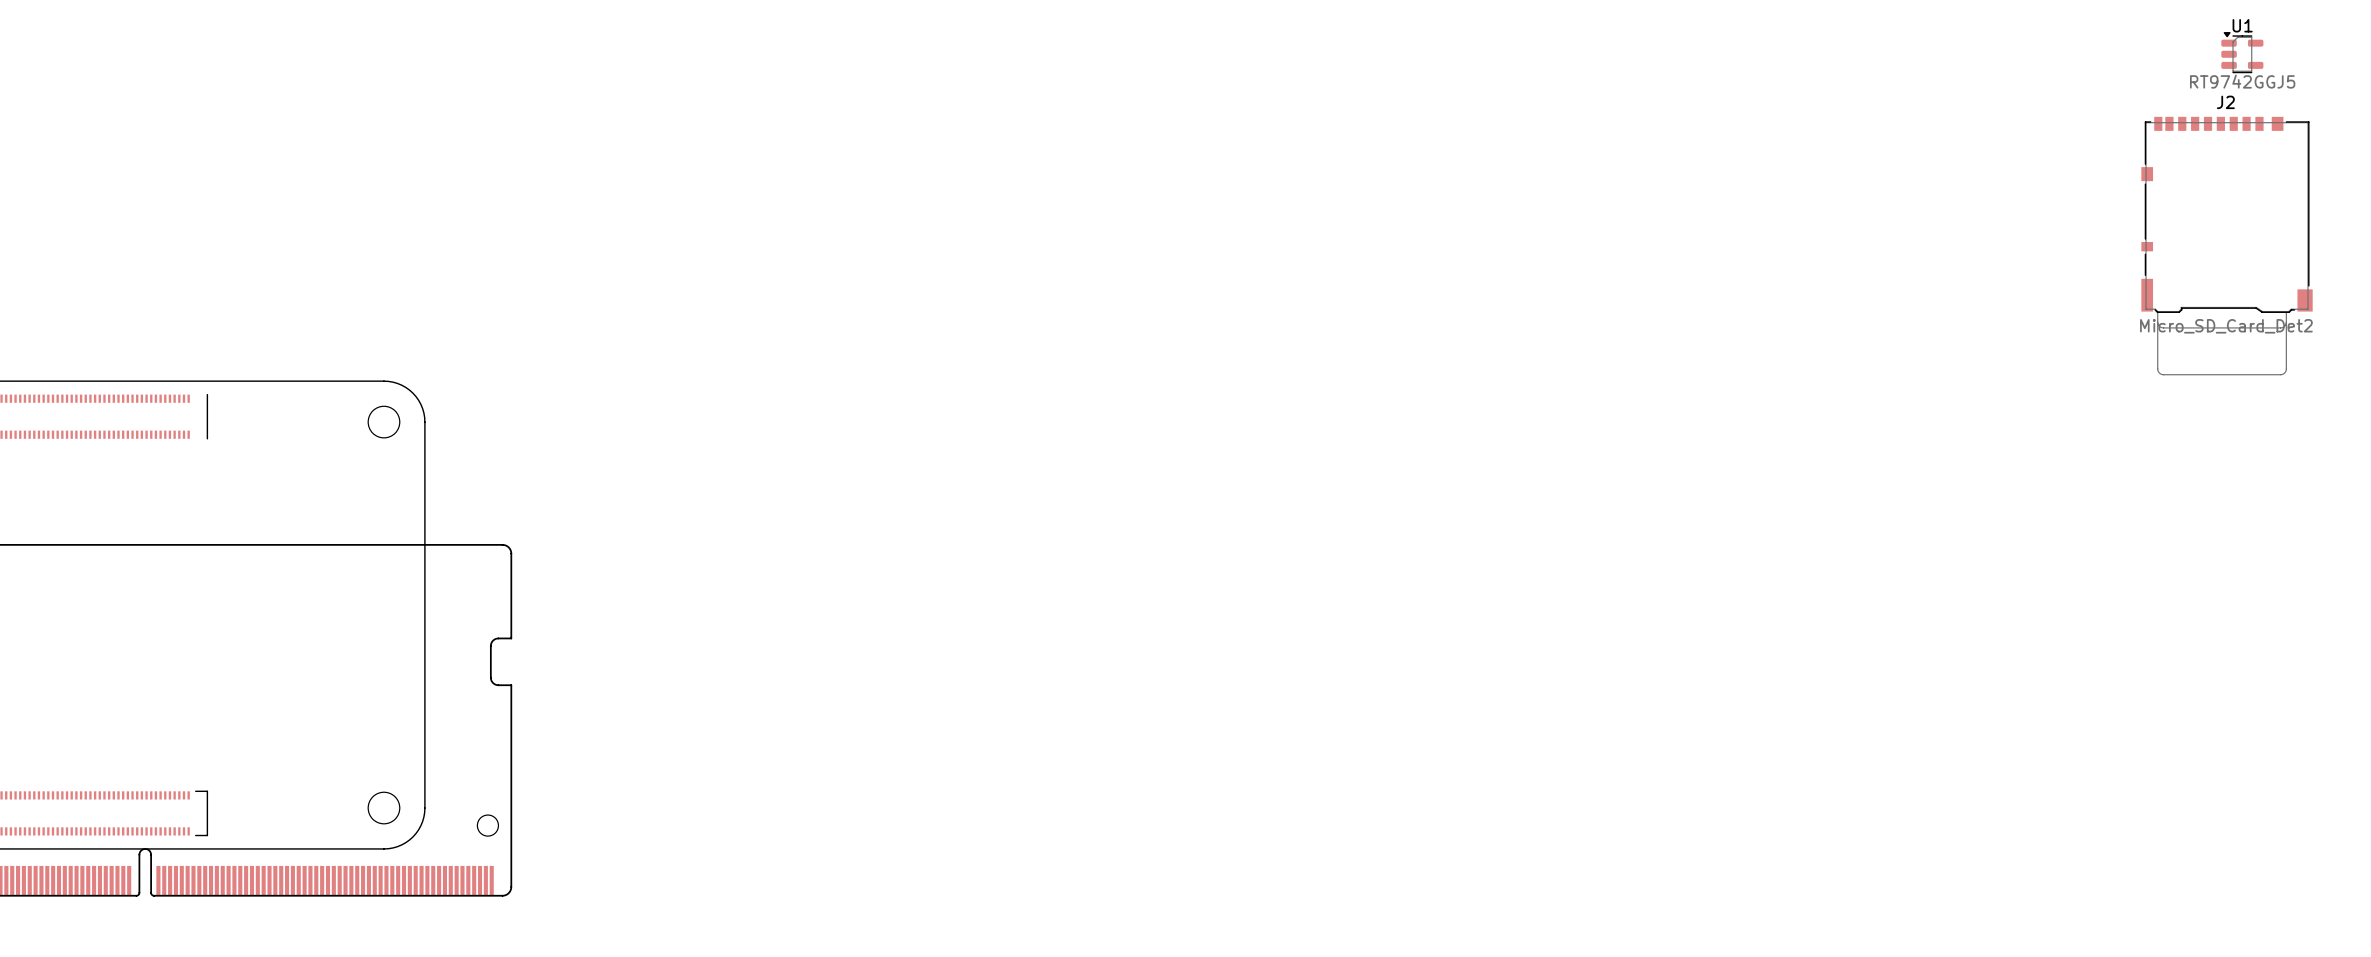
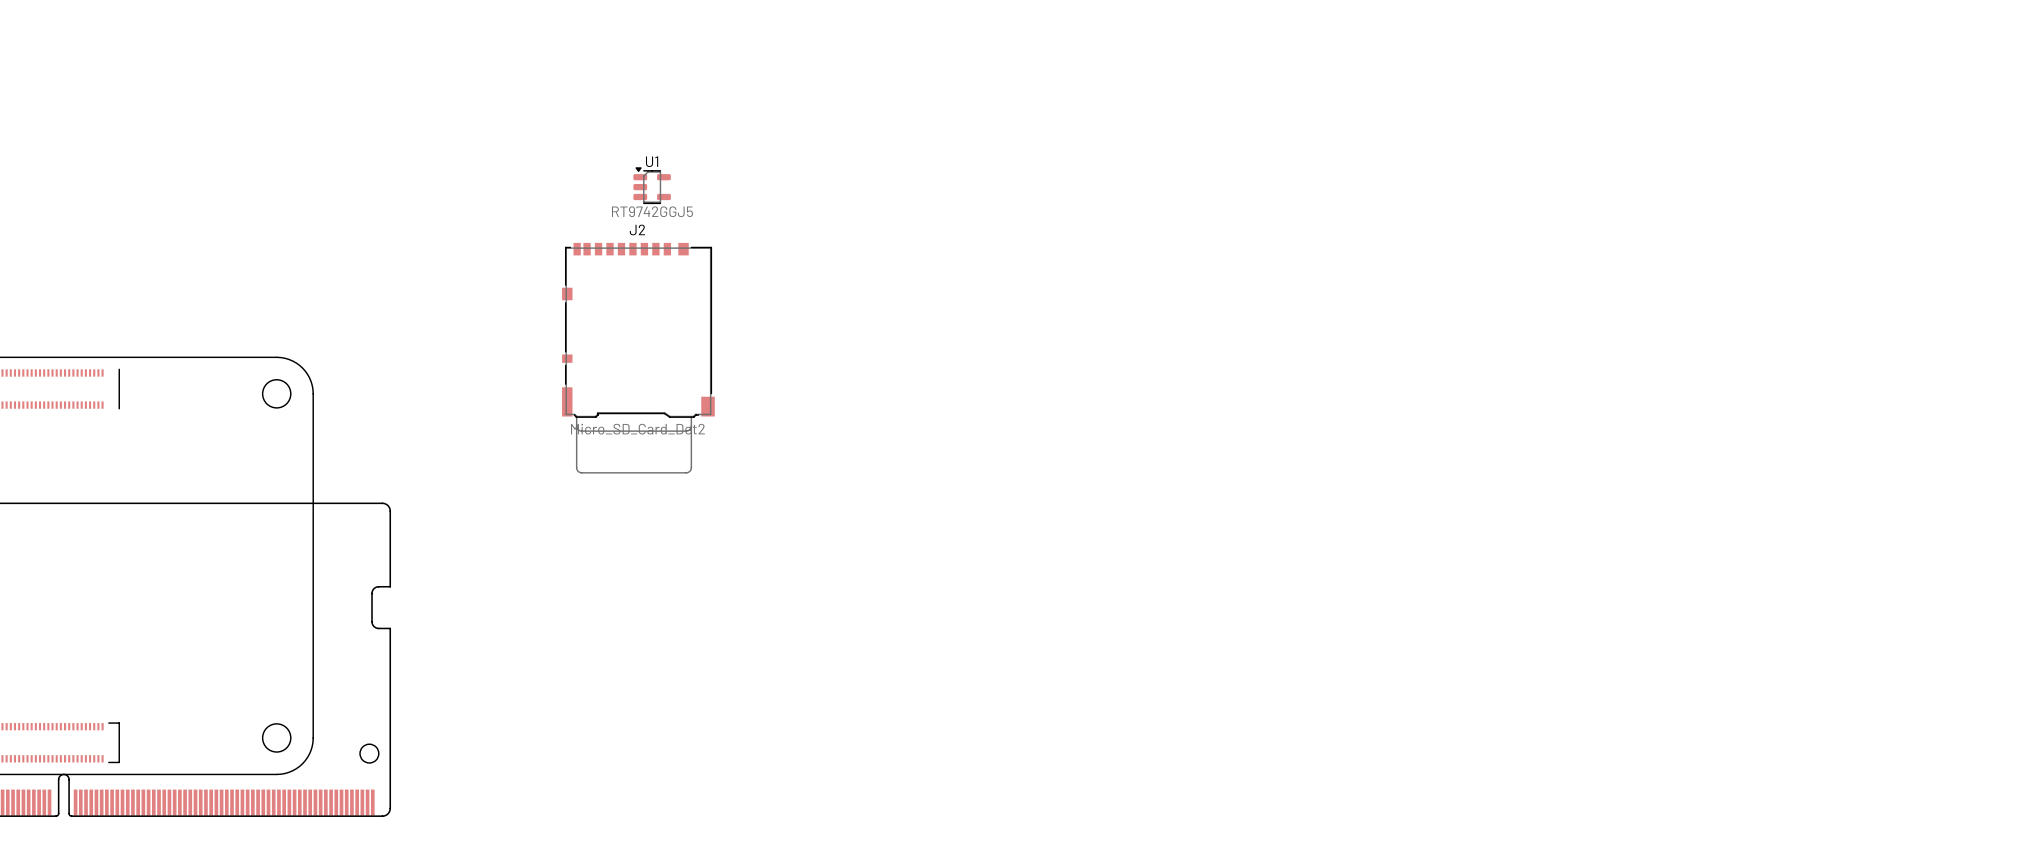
U1 position: (2242, 52) -> (652, 185)
J2 position: (2227, 246) -> (638, 358)

